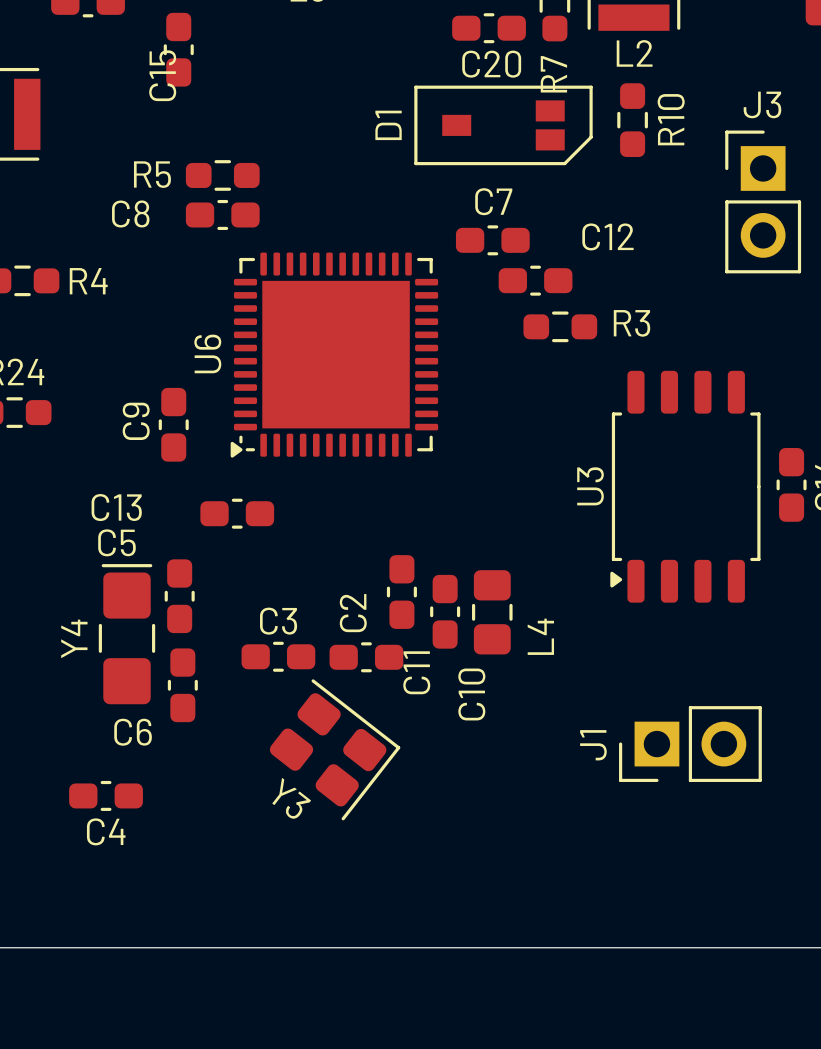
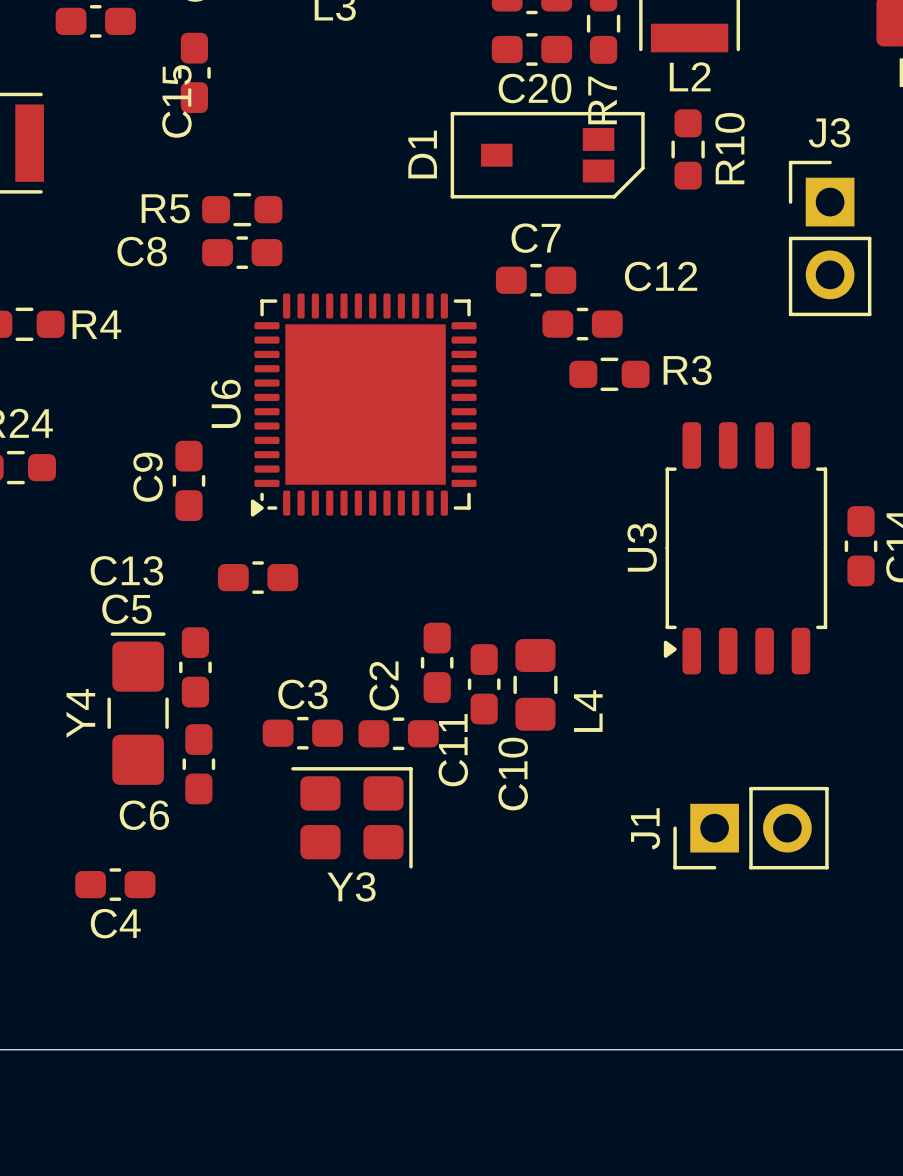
Y3 rotation: 0° (335, 749) -> 38° counterclockwise (351, 817)

